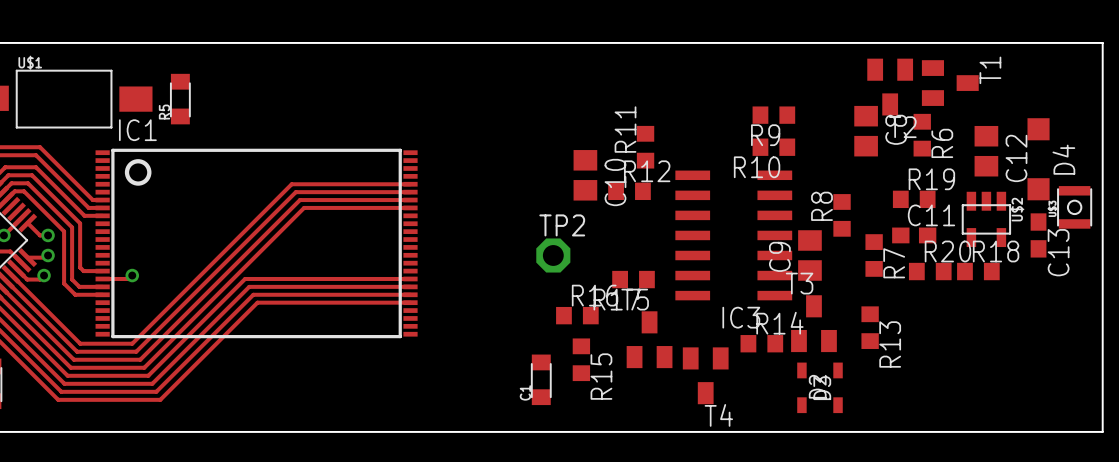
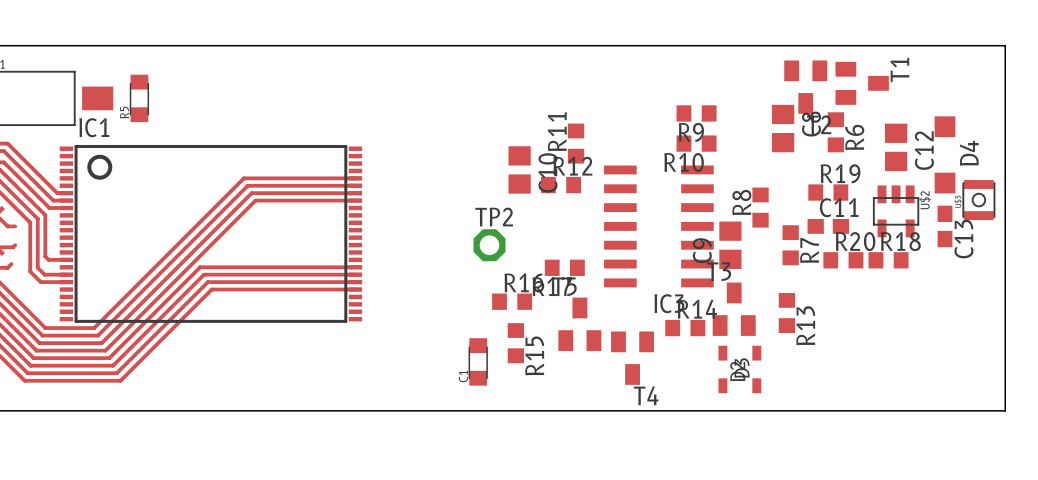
via: (48, 235) -> none
via: (48, 255) -> none
via: (44, 275) -> none
track: (132, 275) (128, 278) (102, 278) -> none
via: (132, 275) -> none

